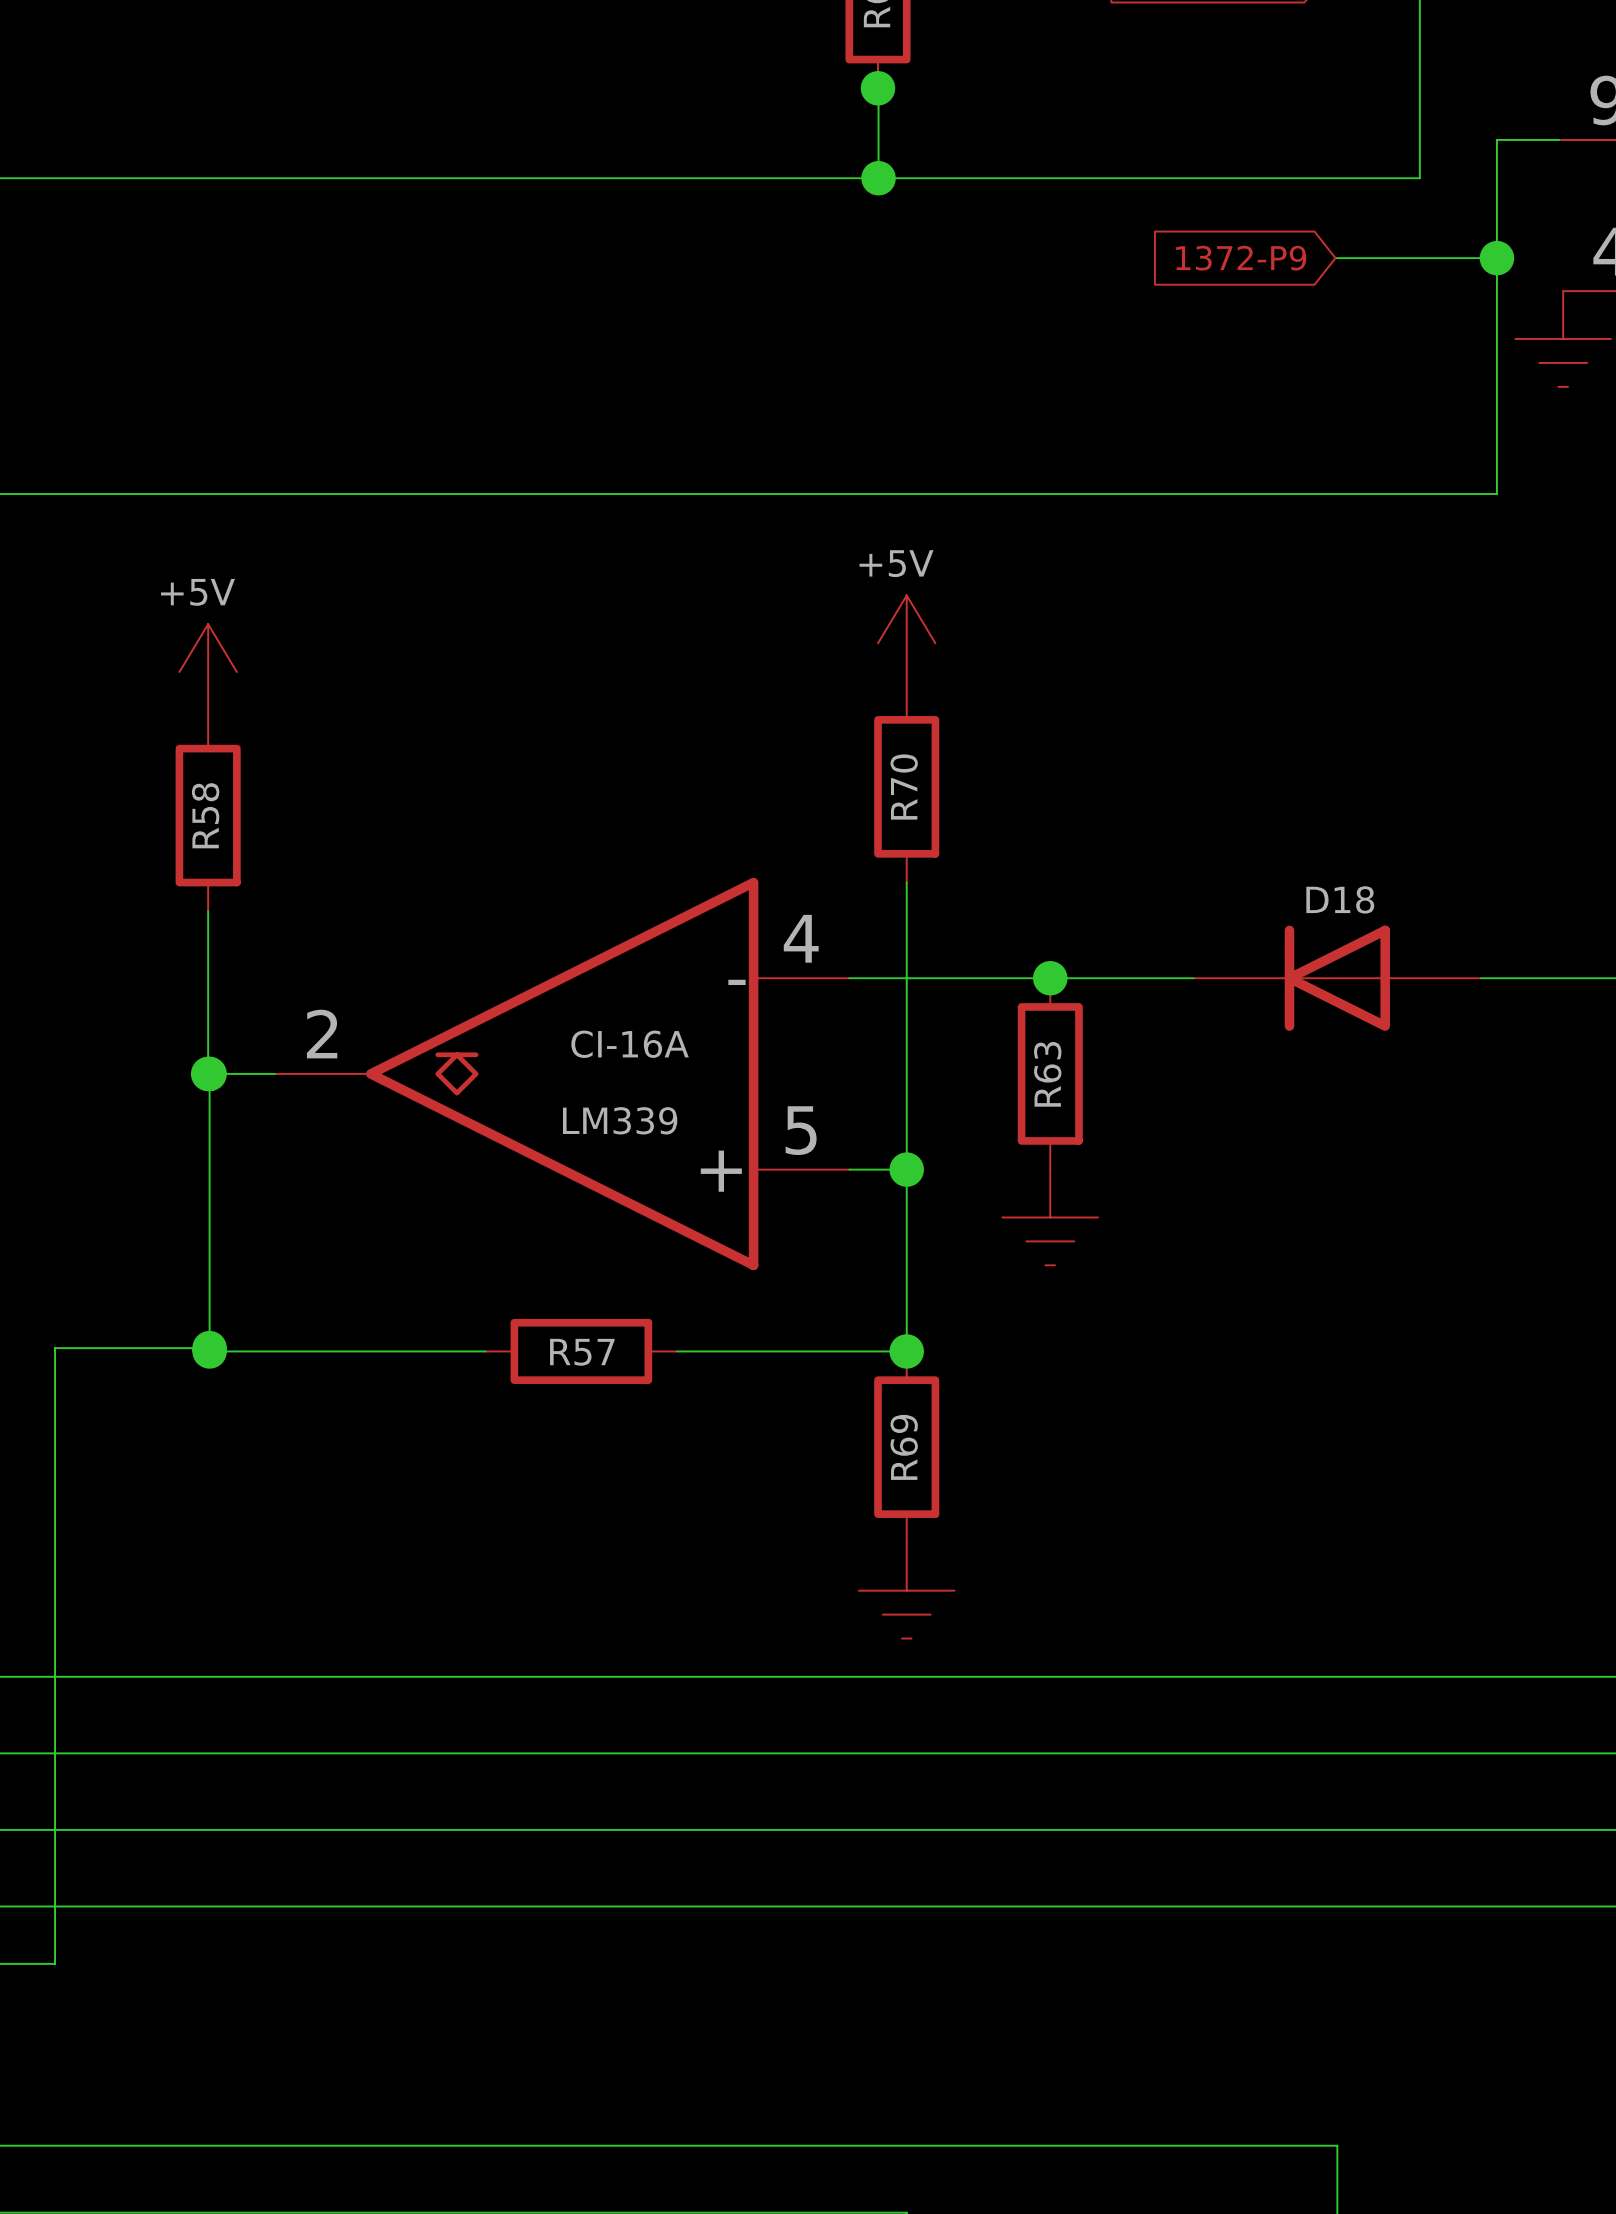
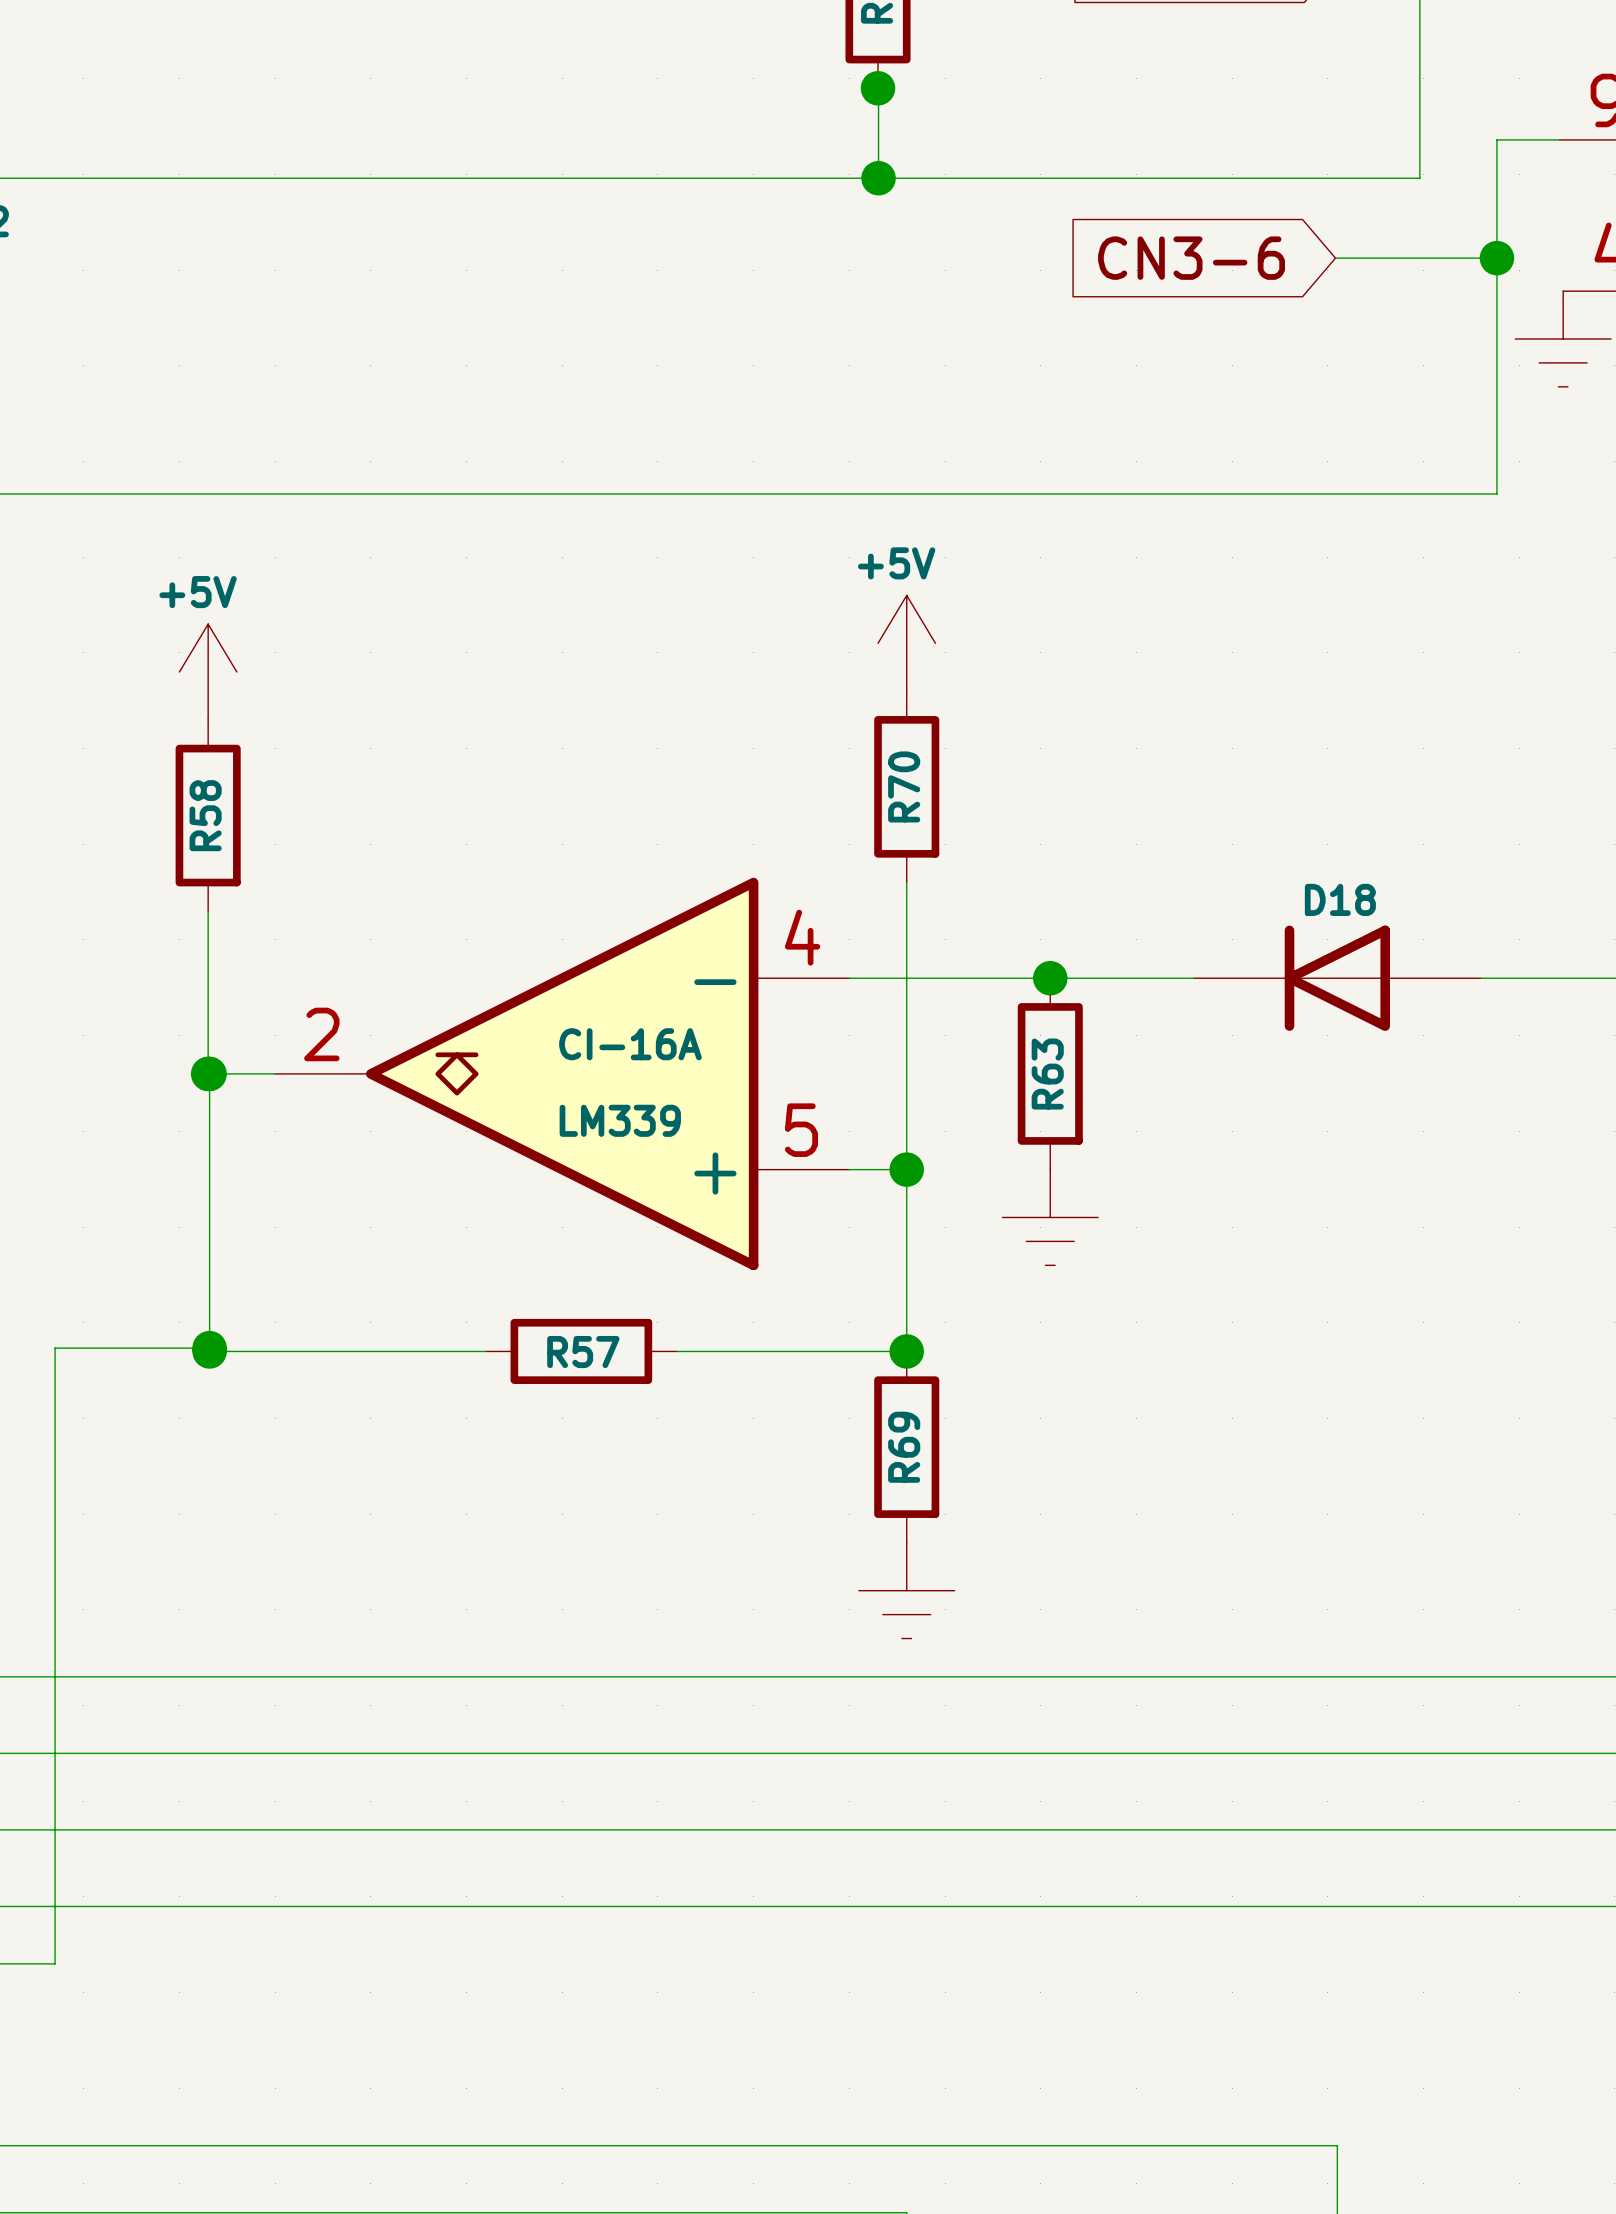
global label: 1372-P9 (1241, 258) -> CN3-6 (1191, 258)

